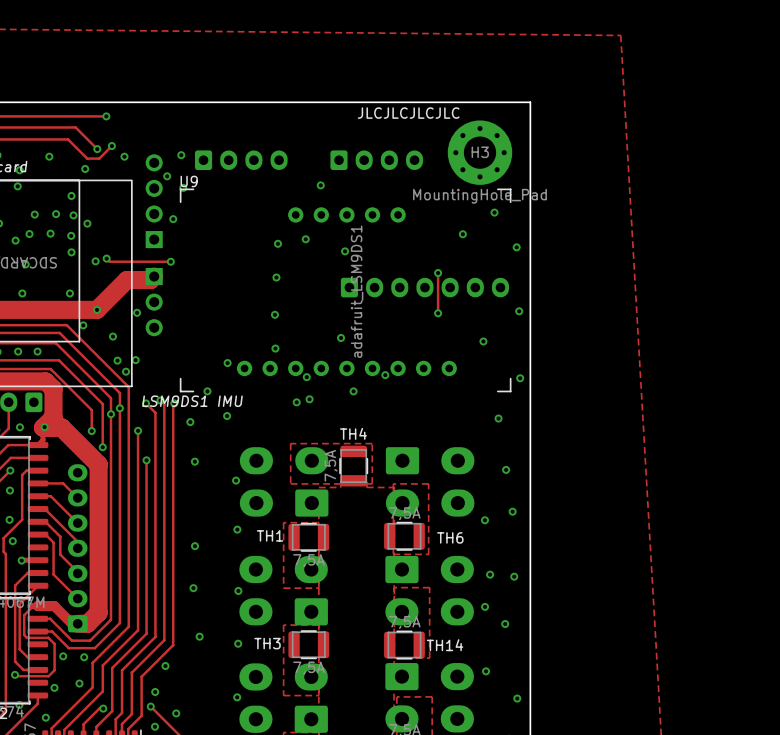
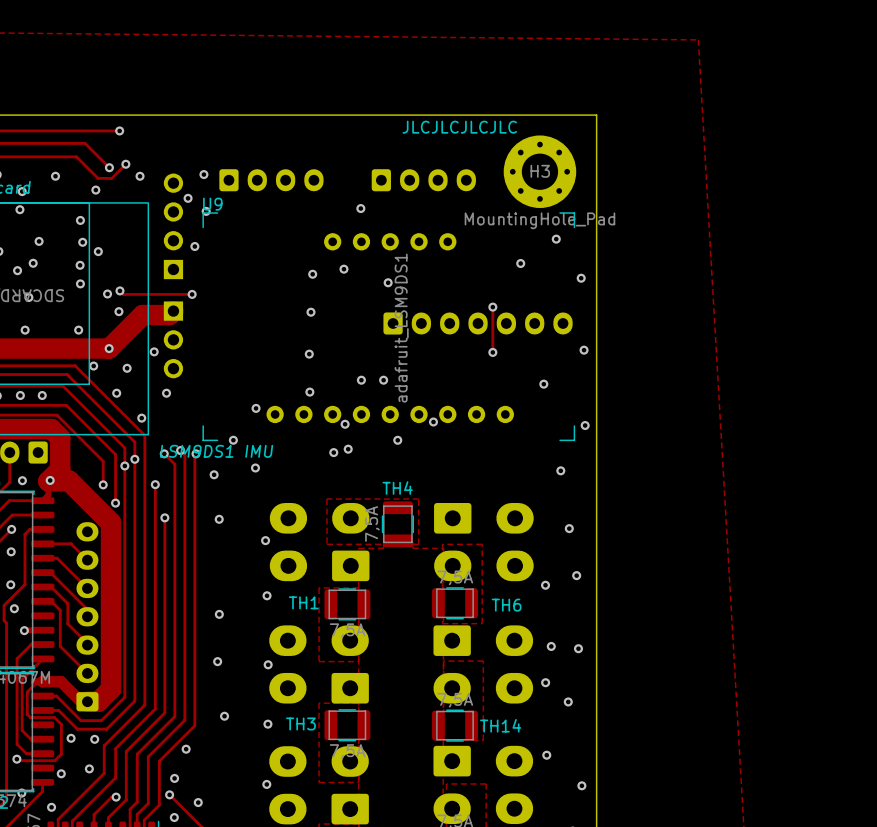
via: (56, 214) -> none
via: (50, 233) -> none
via: none -> (118, 311)
via: none -> (127, 368)
via: (113, 336) -> none
via: none -> (361, 380)
via: none -> (116, 393)
via: none -> (166, 393)
via: (117, 360) -> none
via: (135, 360) -> none

